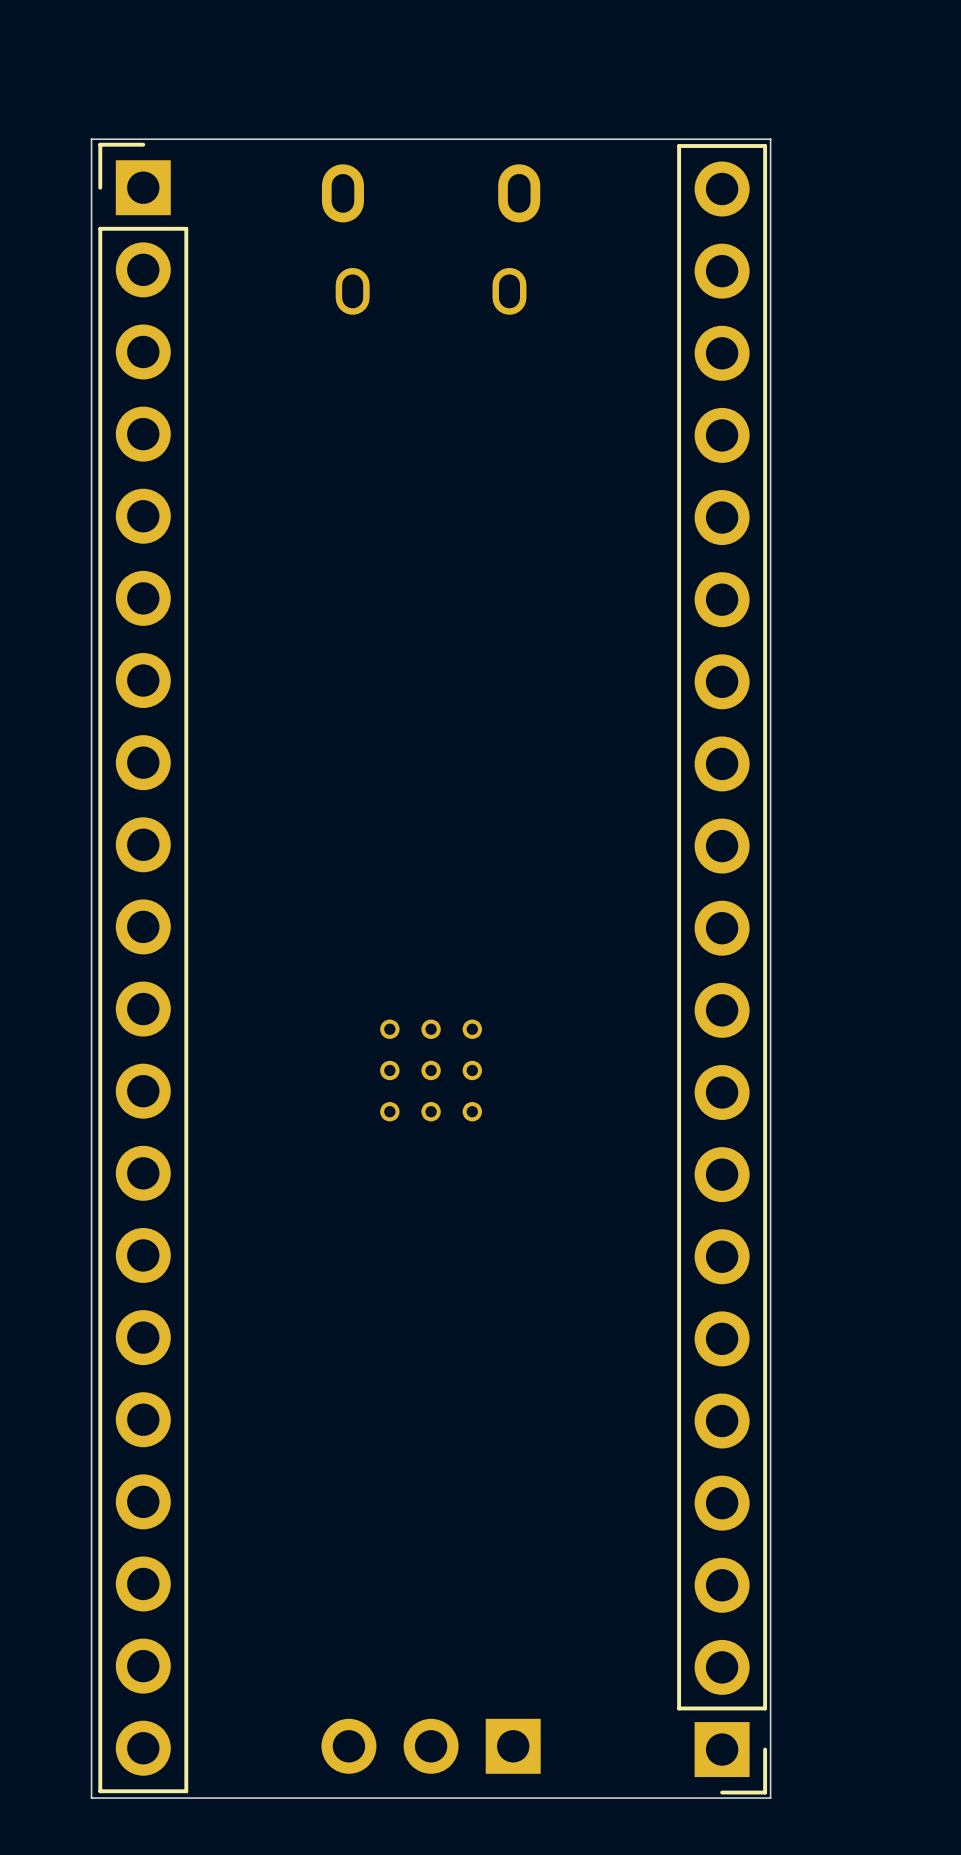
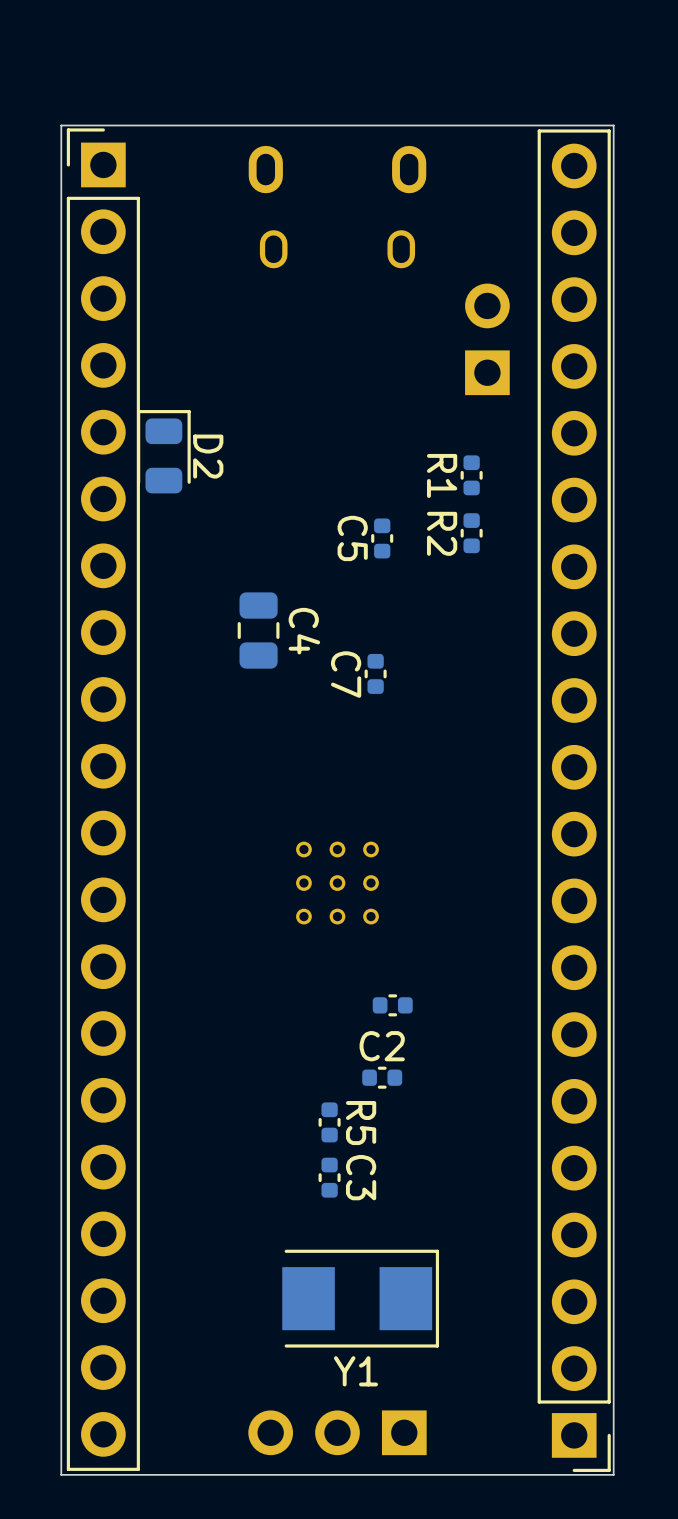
part: none -> (487, 339)
D2: none -> (163, 451)
R1: none -> (471, 475)
R2: none -> (471, 533)
C5: none -> (382, 538)
C4: none -> (258, 630)
C7: none -> (375, 673)
part: none -> (392, 1005)
C2: none -> (382, 1077)
R5: none -> (329, 1122)
C3: none -> (329, 1177)
Y1: none -> (360, 1298)

